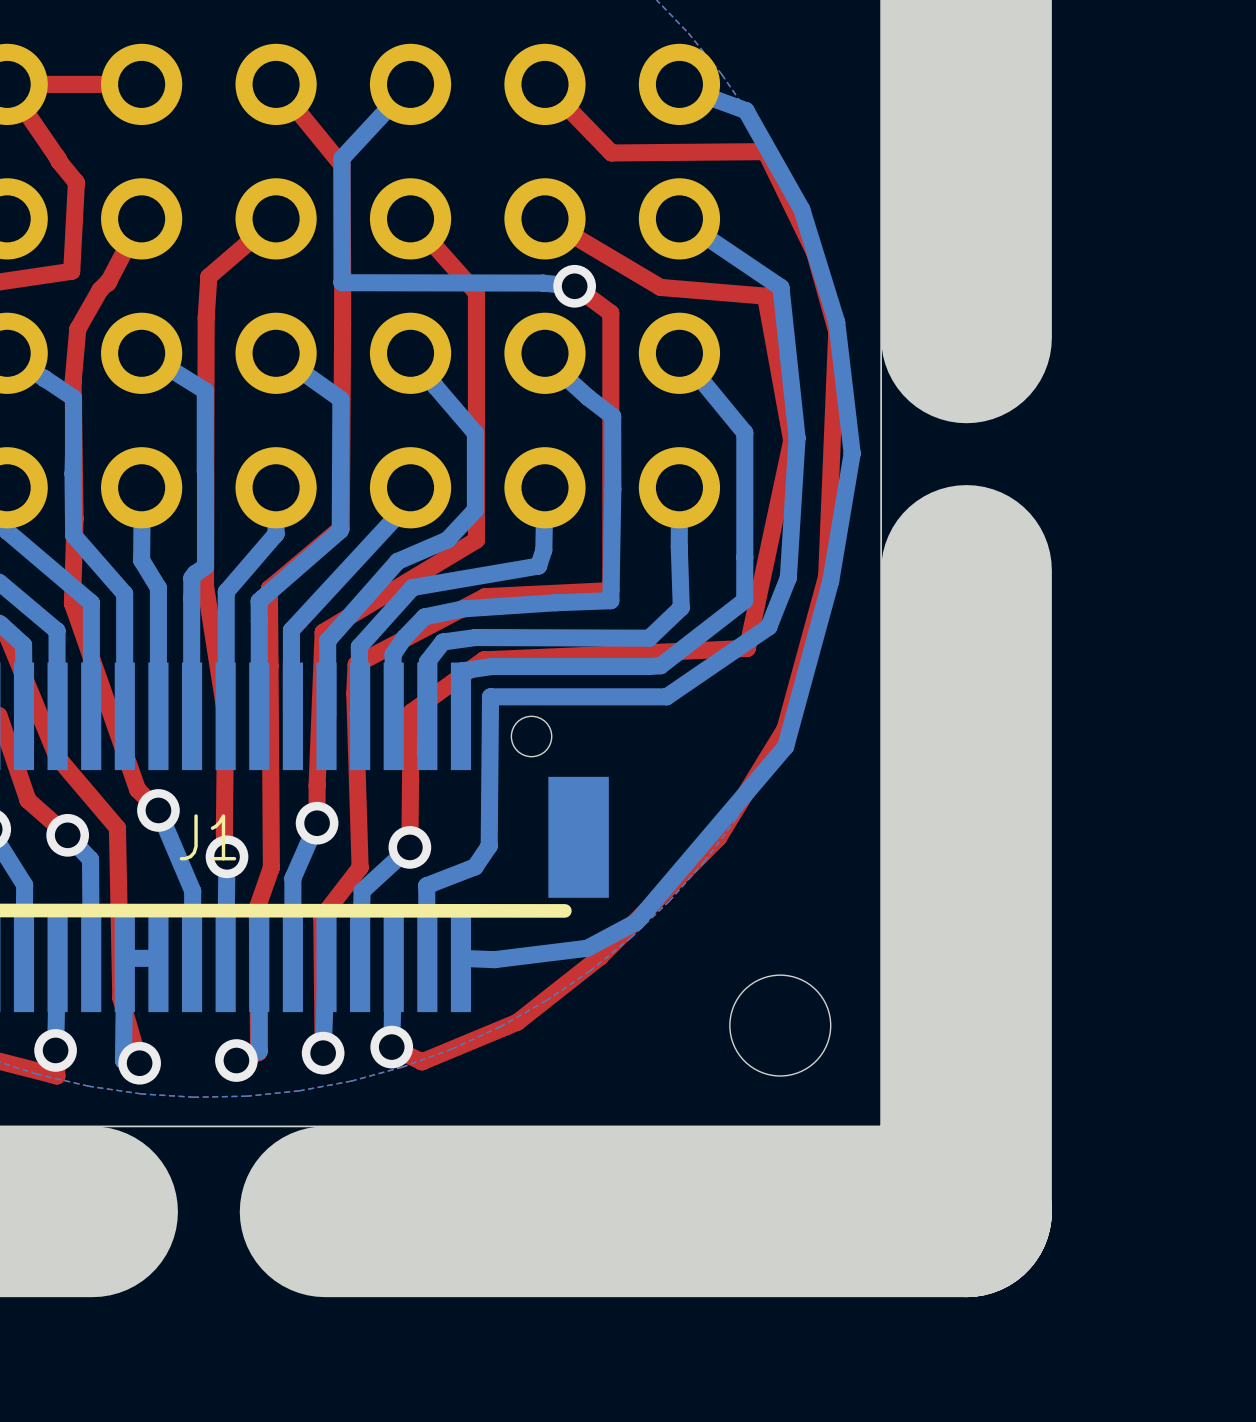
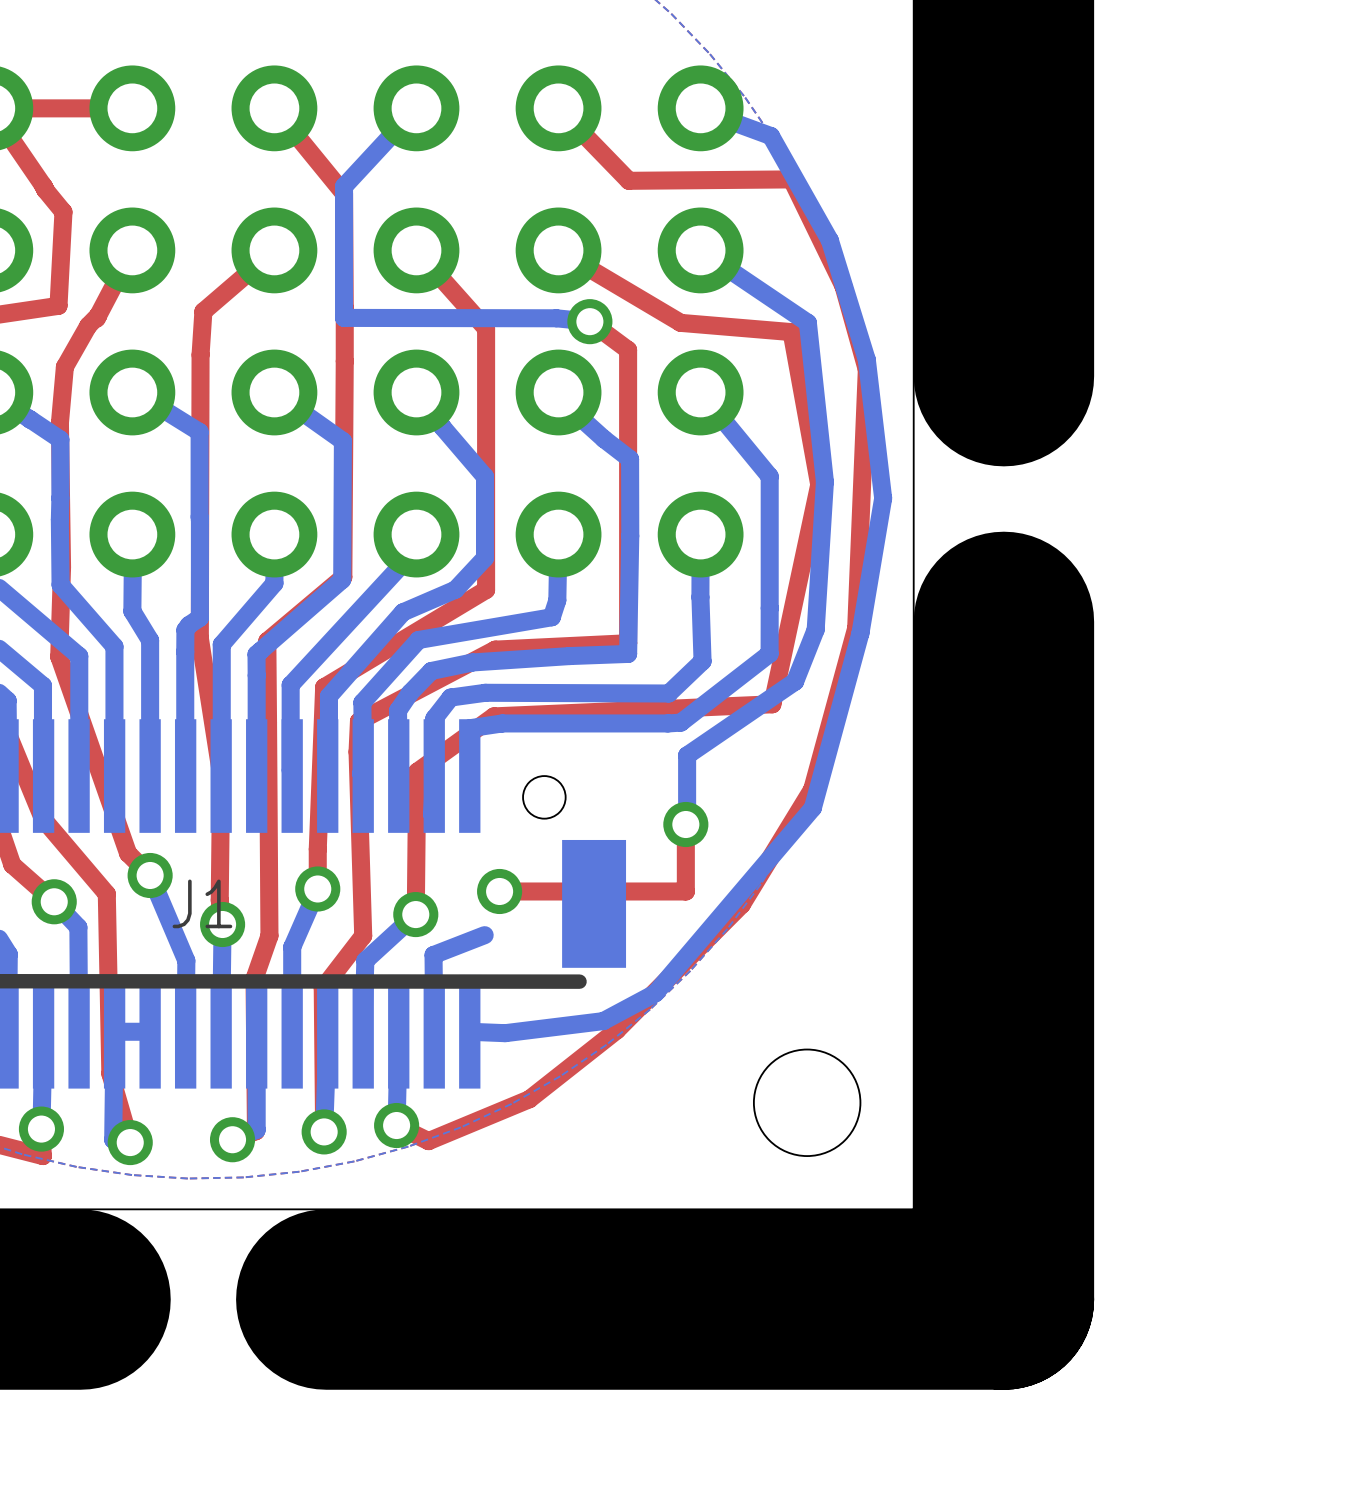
bottom track: (666, 696) (490, 696) (489, 846) (475, 866) -> (687, 755) (685, 824)
top track: none -> (685, 824) (685, 891) (499, 891)
via: none -> (685, 824)
via: none -> (499, 891)

